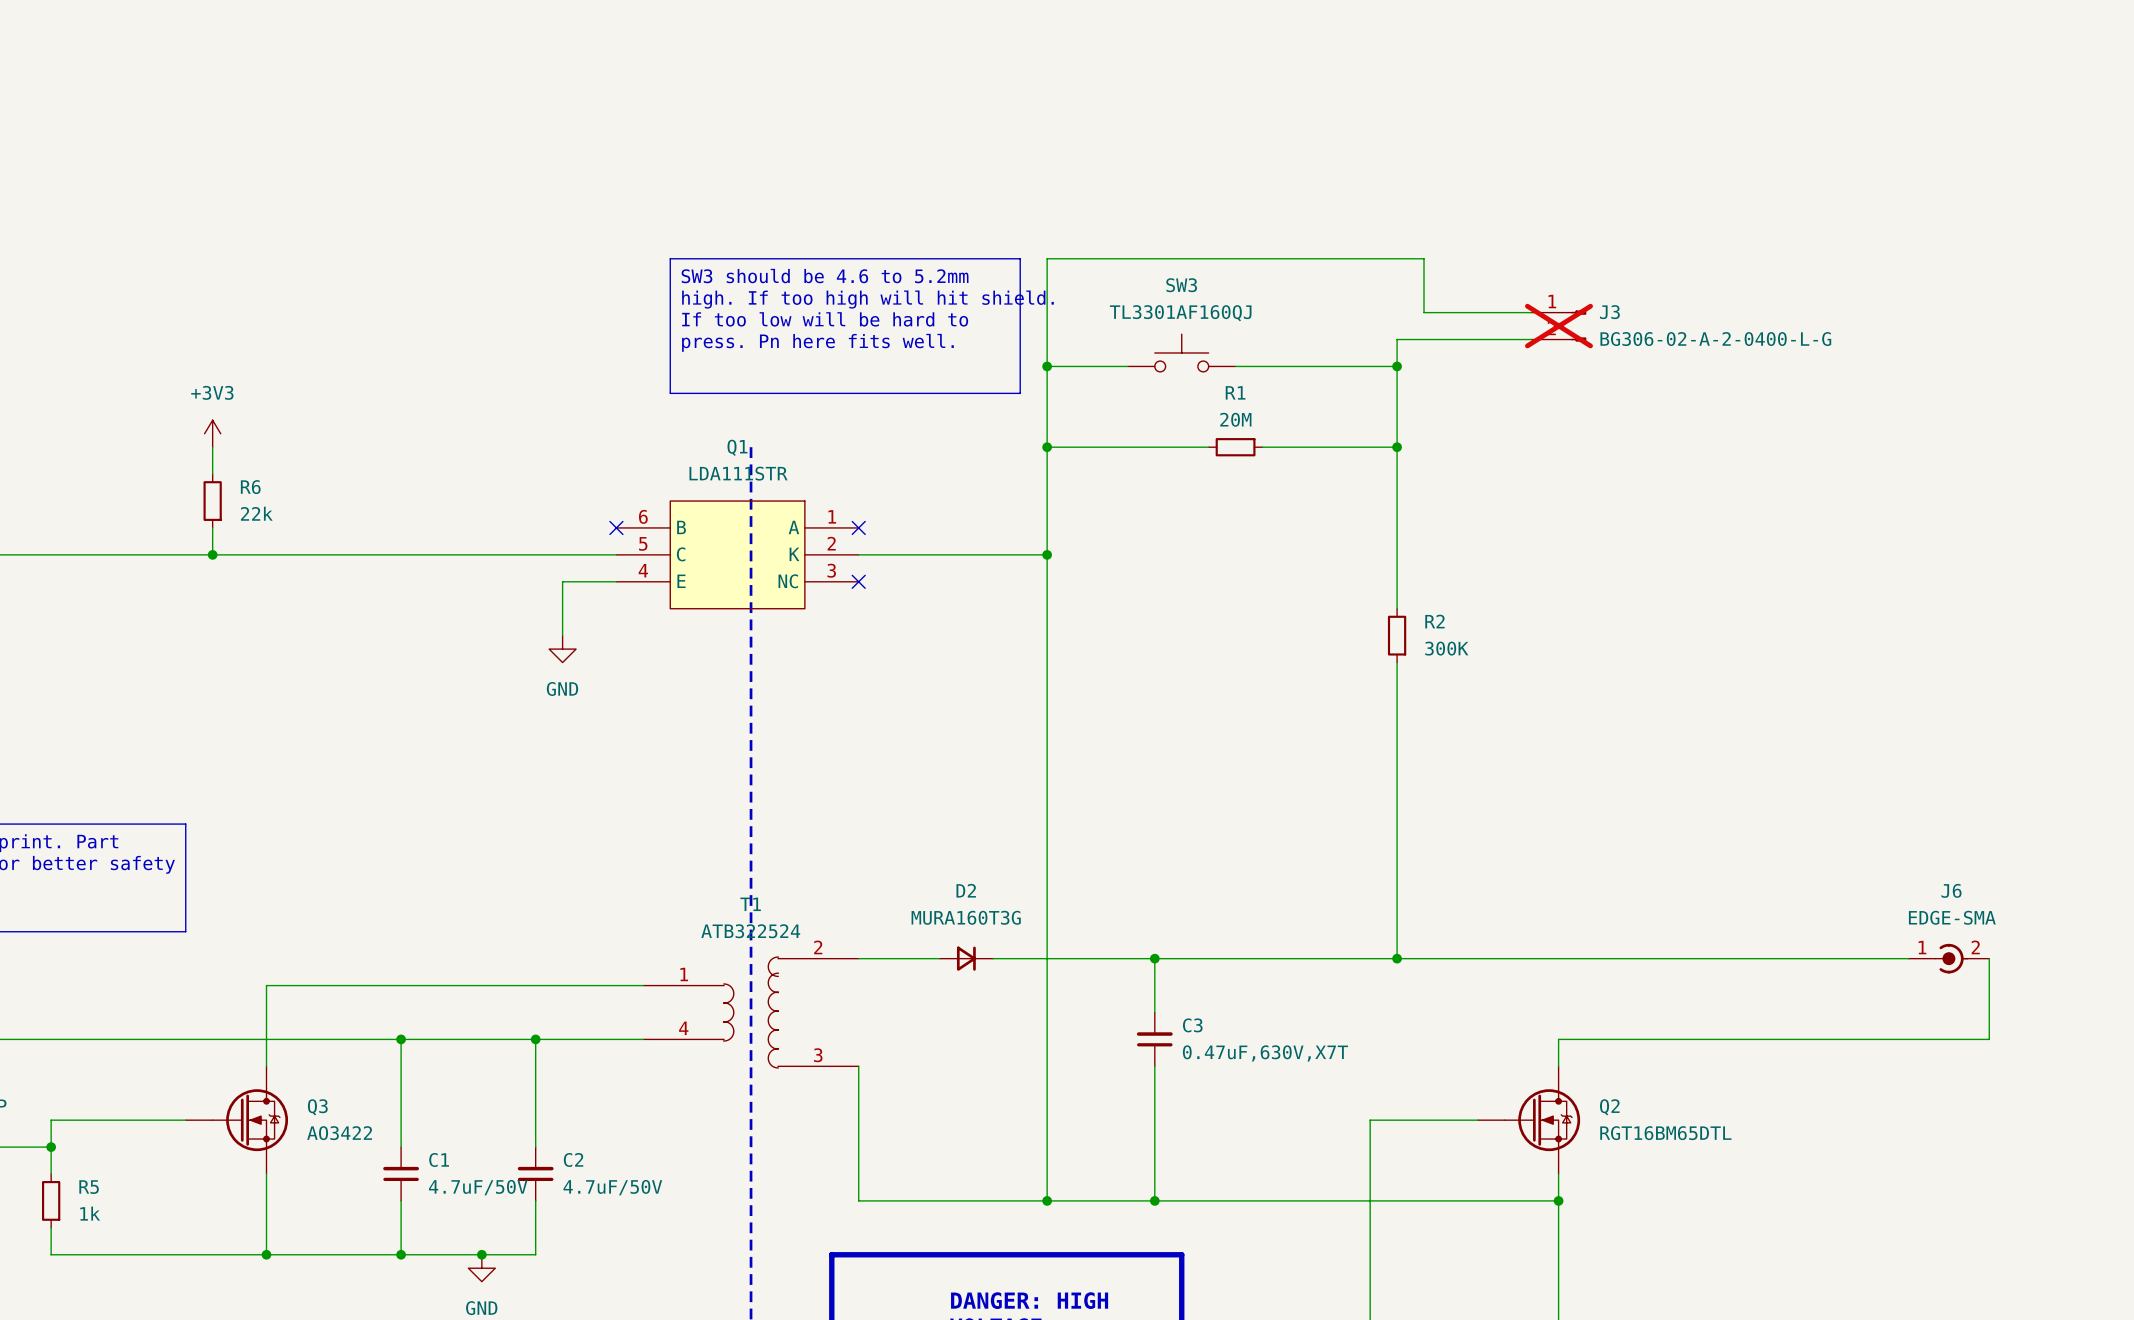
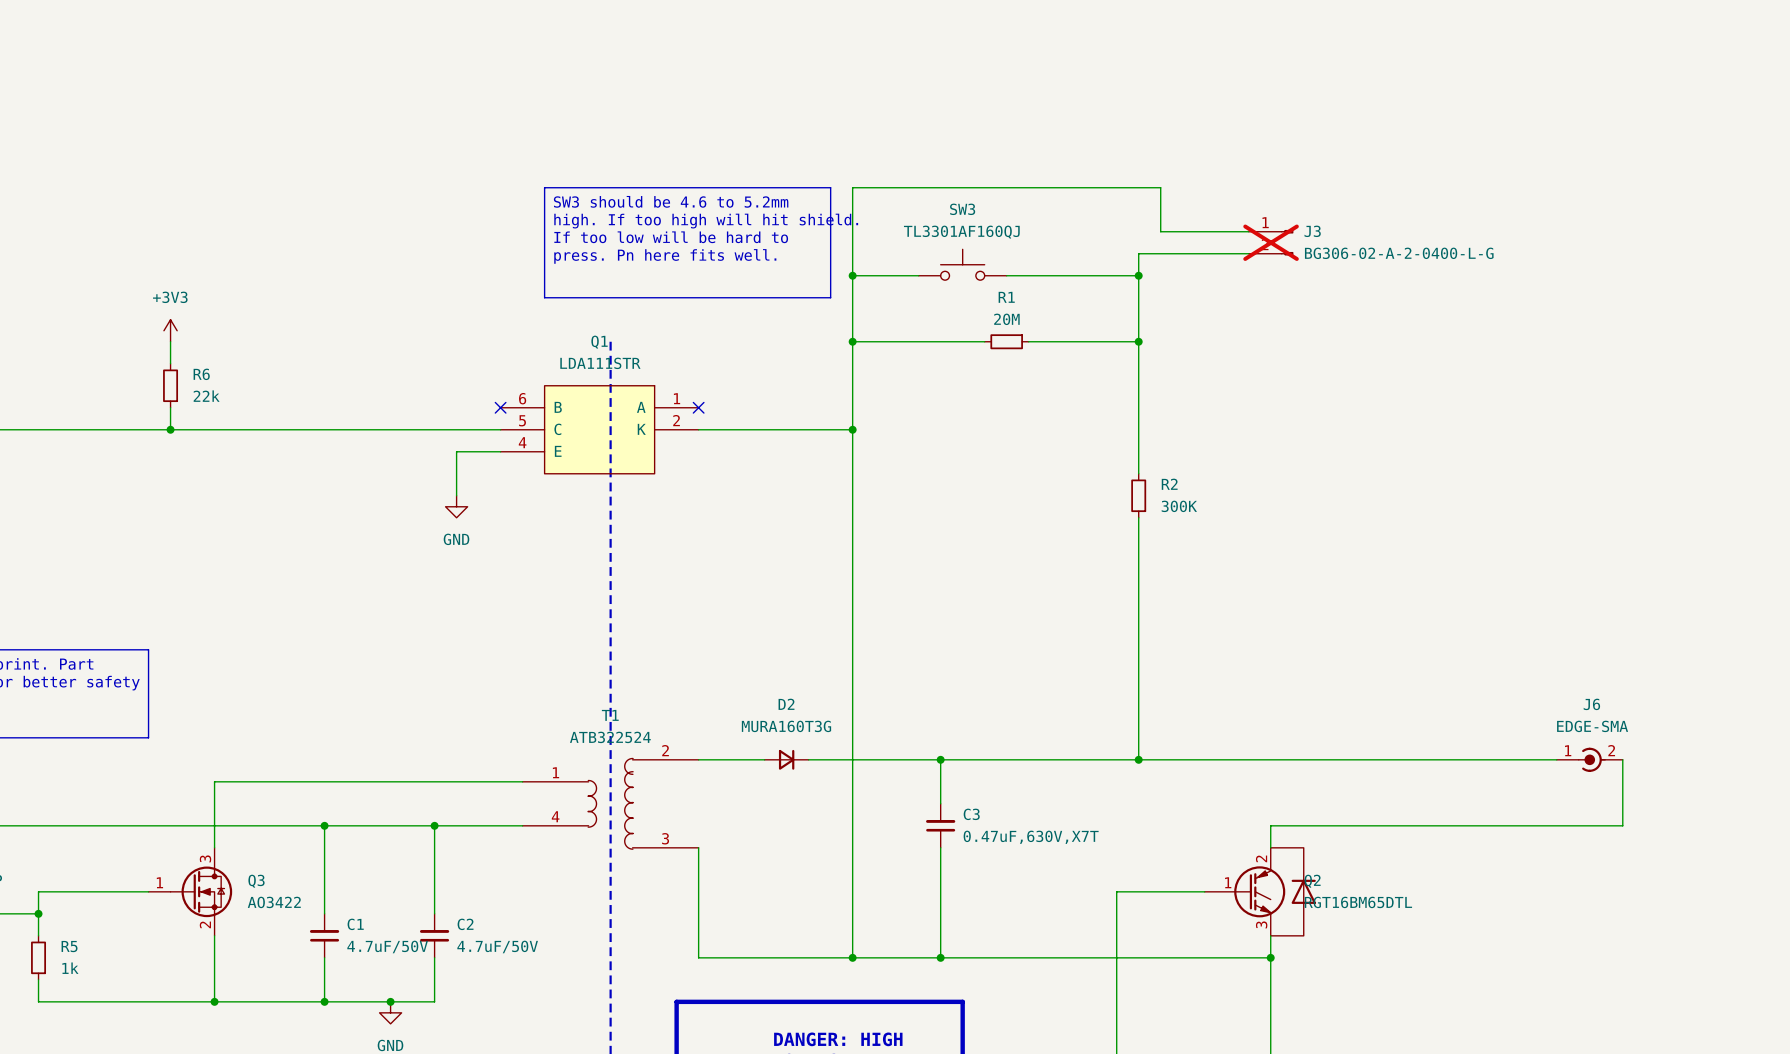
Q1 symbol: [616, 501, 859, 609] -> [500, 385, 699, 474]
no-connect mark: (858, 581) -> none
Q3 symbol: [185, 1066, 289, 1175] -> [148, 847, 233, 936]
Q2 symbol: [1477, 1066, 1581, 1175] -> [1204, 847, 1316, 936]

